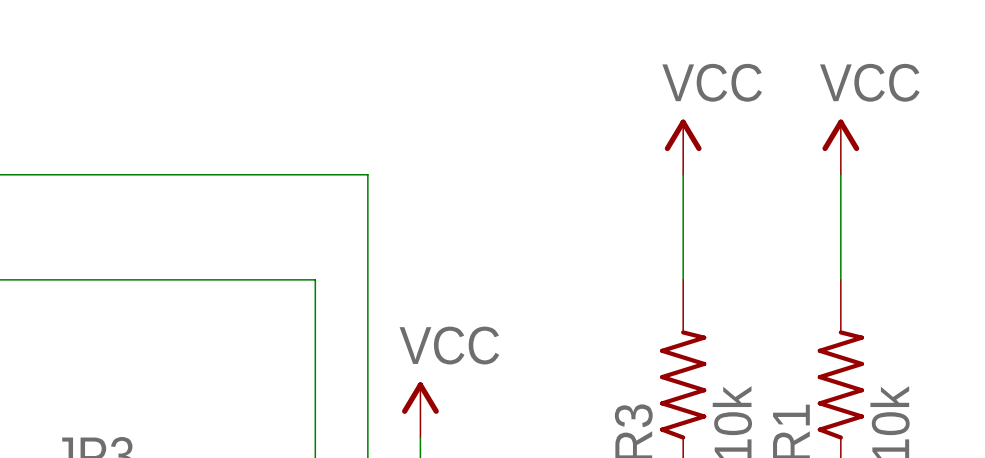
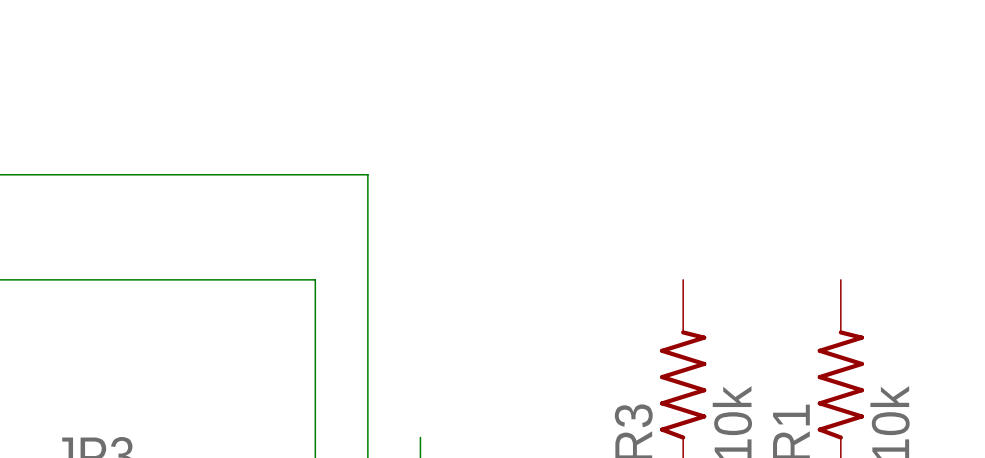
power symbol: VCC (683, 147) -> none
power symbol: VCC (840, 147) -> none
wire: (683, 174) (683, 279) -> none
wire: (840, 174) (840, 279) -> none
power symbol: VCC (420, 409) -> none

